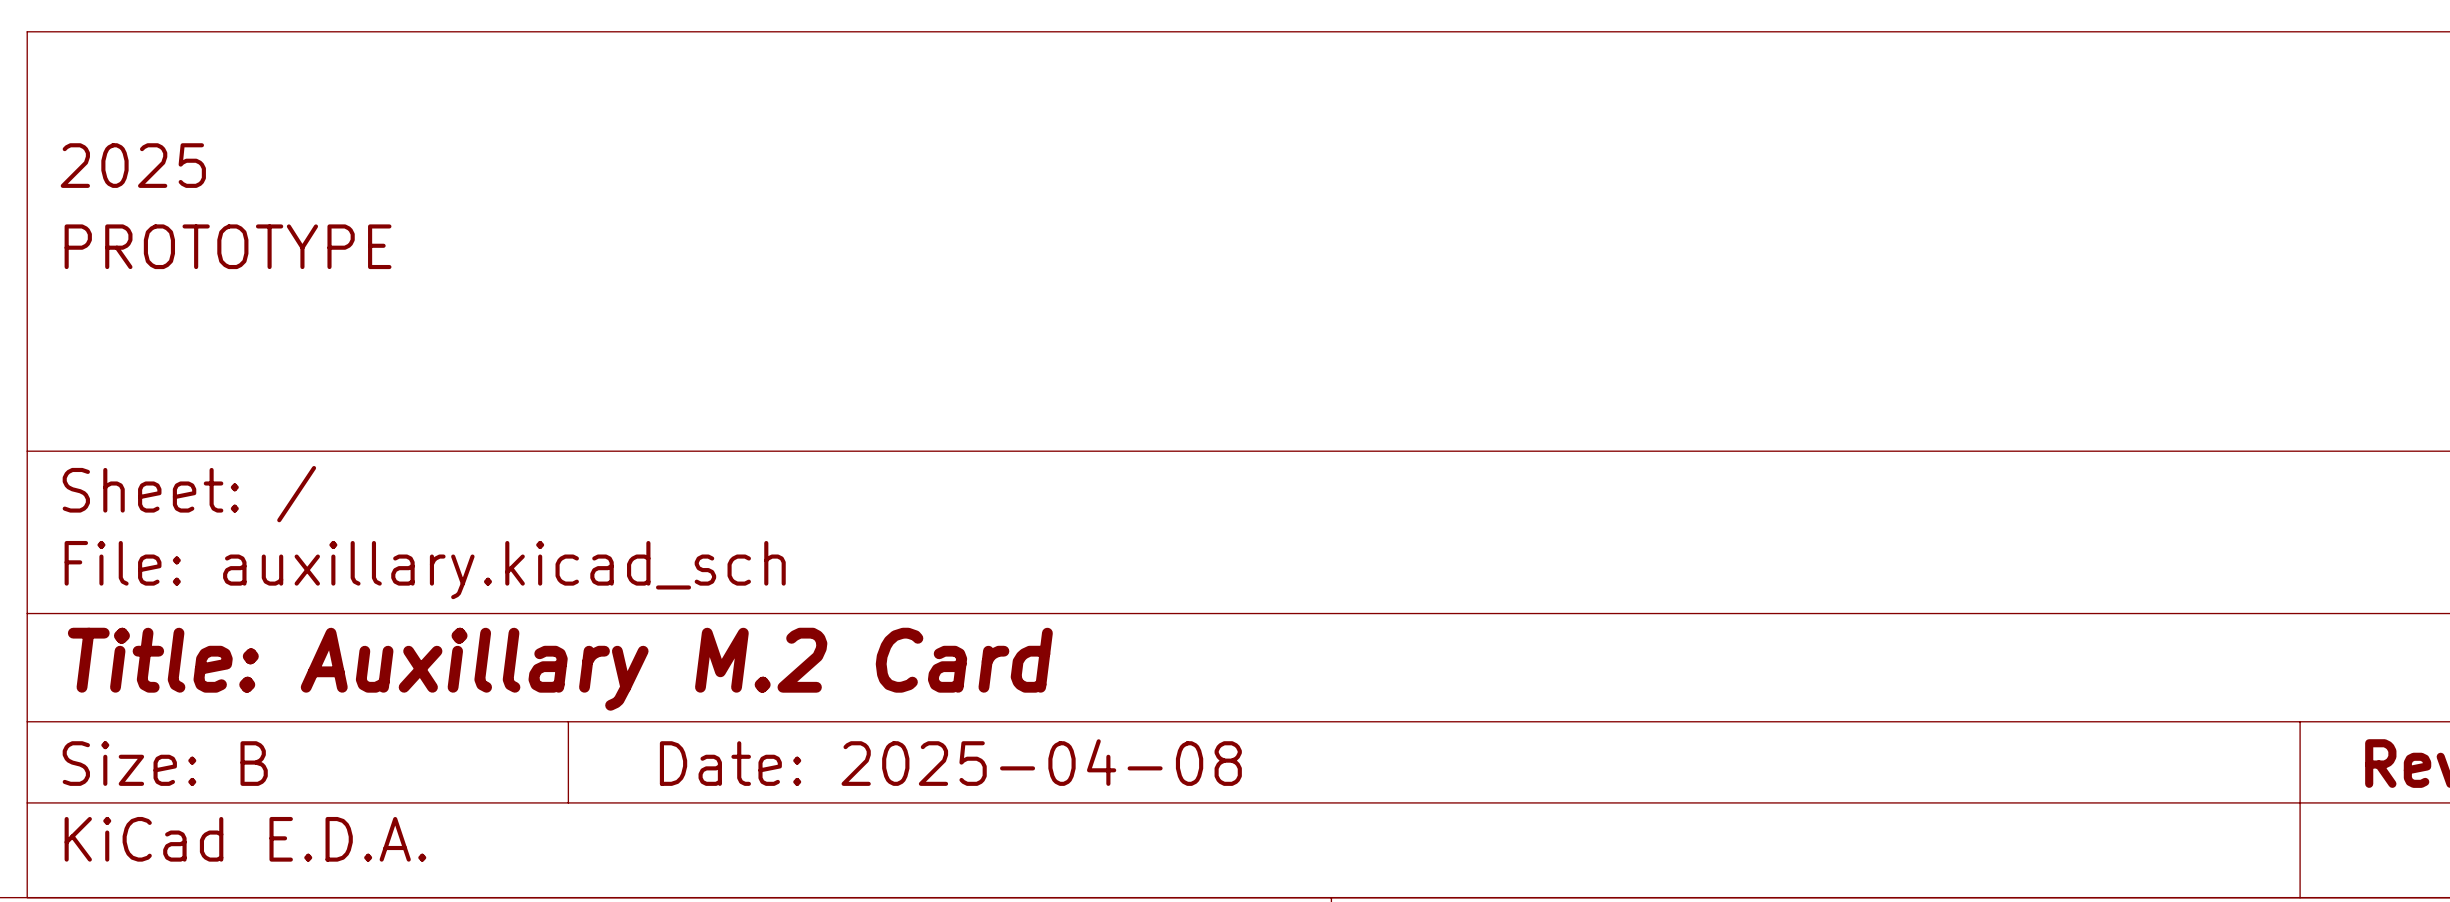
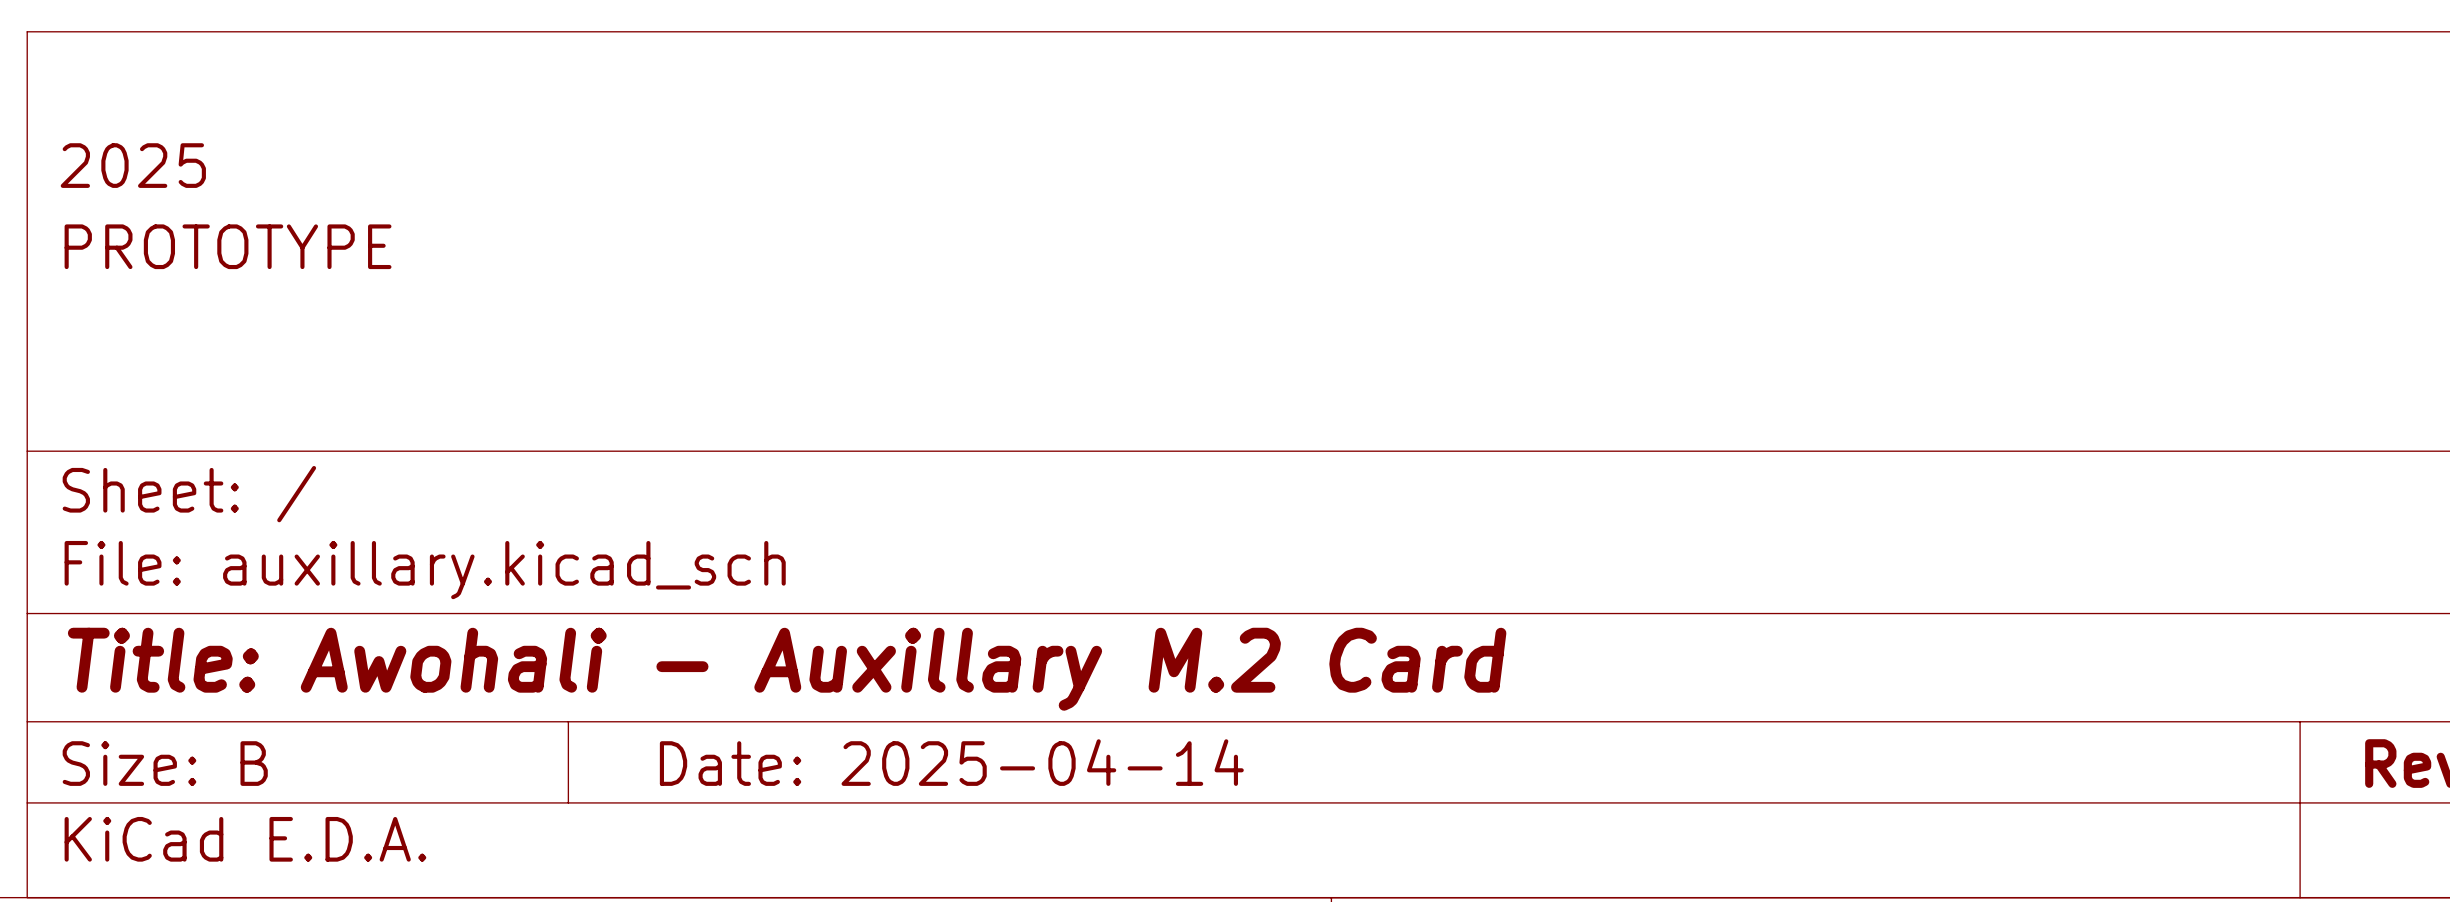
title block: Title: Auxillary M.2 Card (560, 669) -> Title: Awohali - Auxillary M.2 Card (787, 669)
title block: Date: 2025-04-08 (950, 762) -> Date: 2025-04-14 (951, 762)

